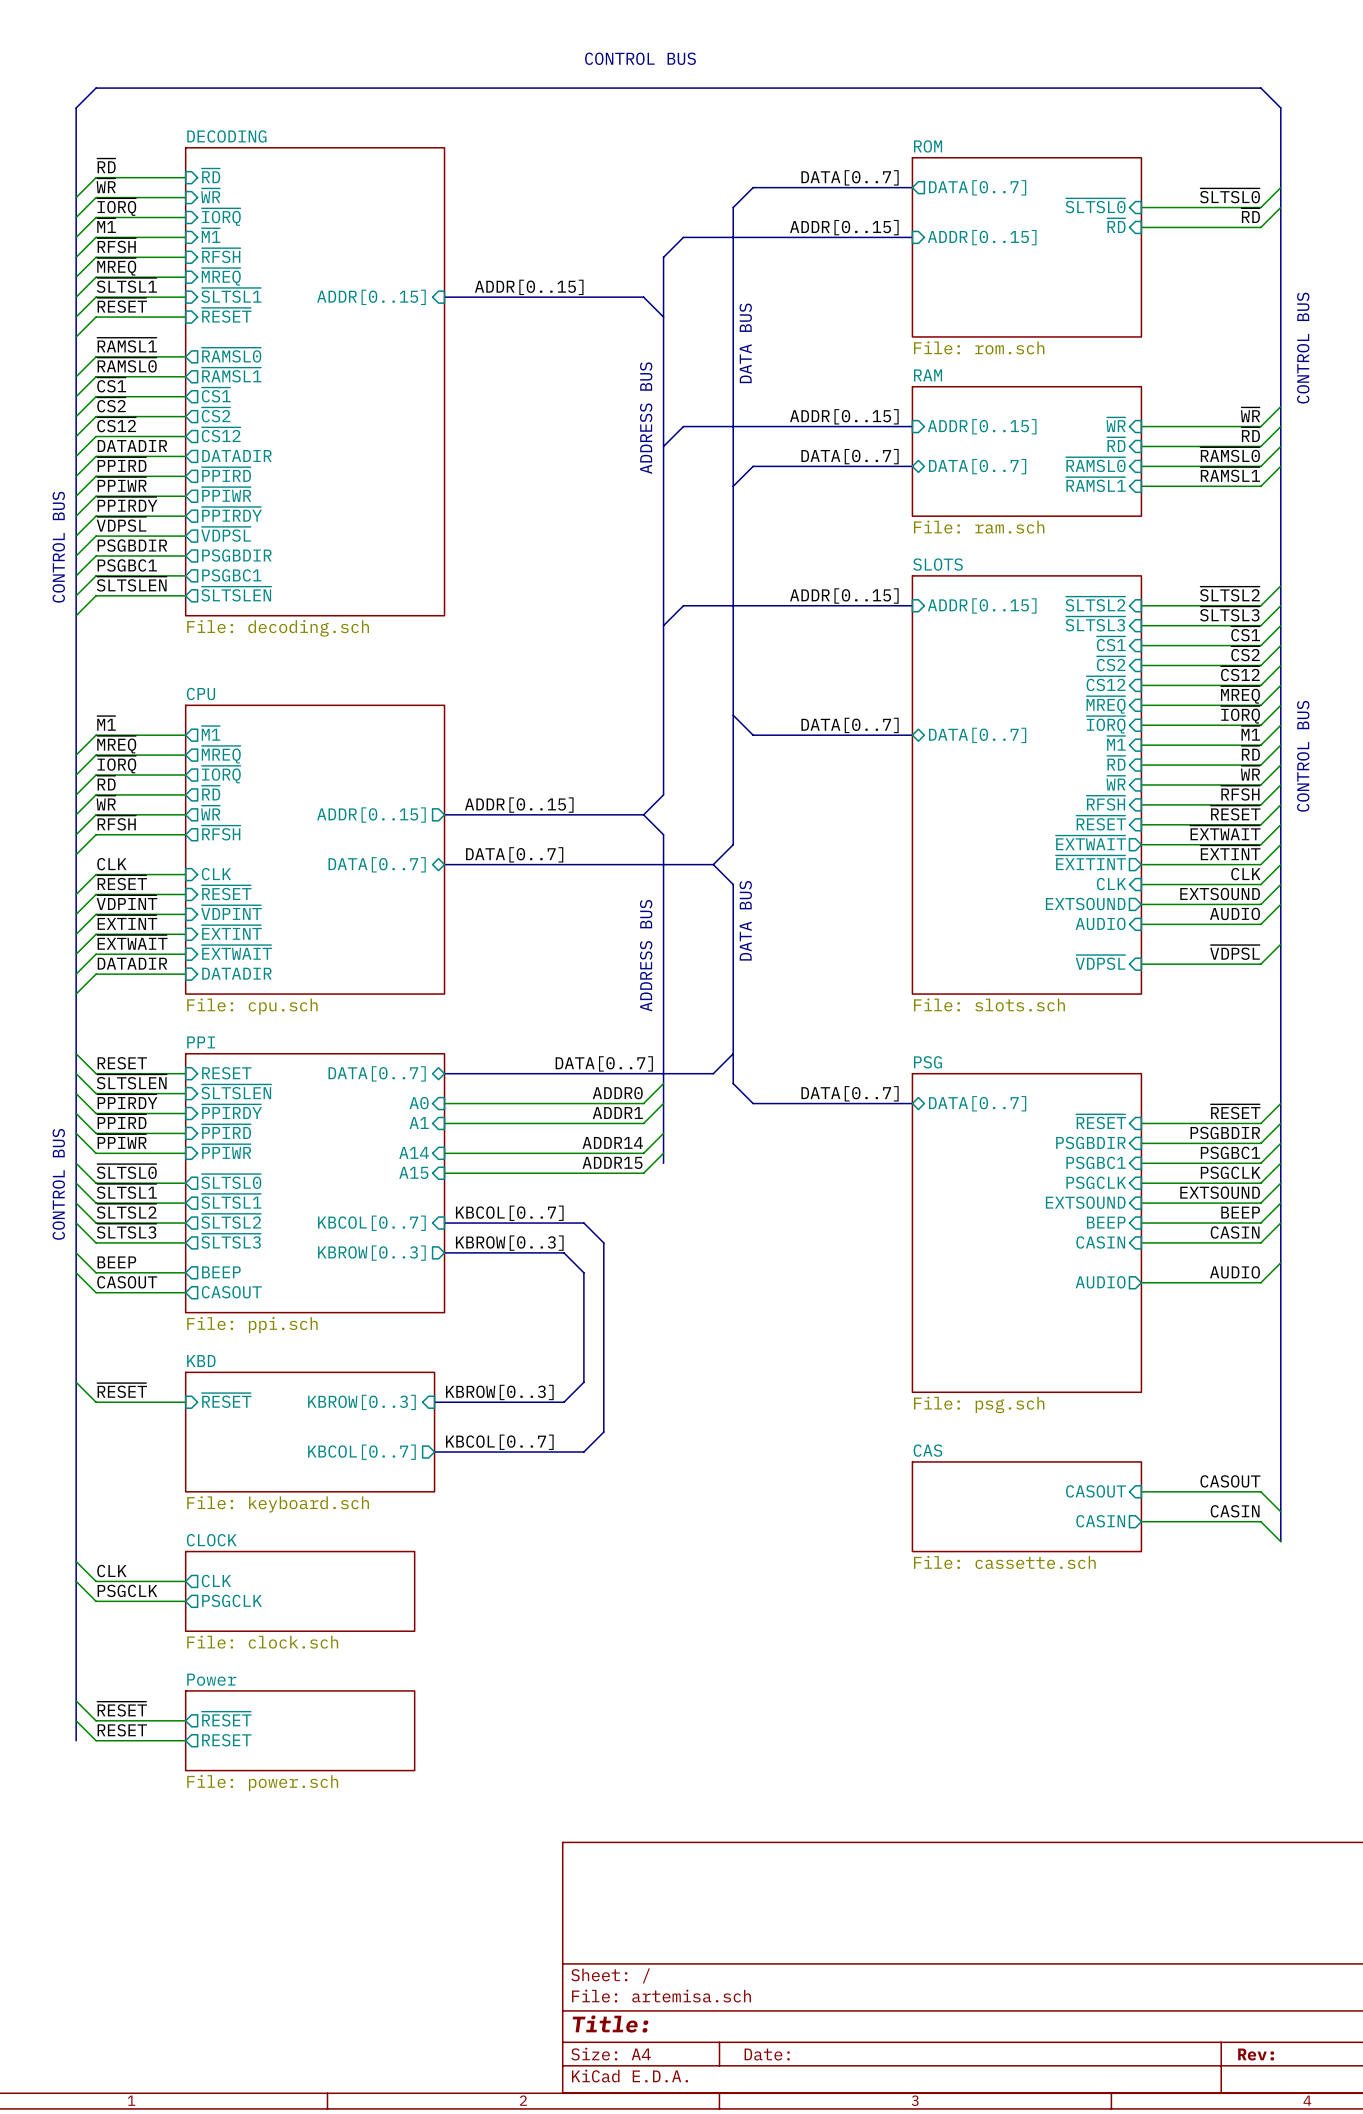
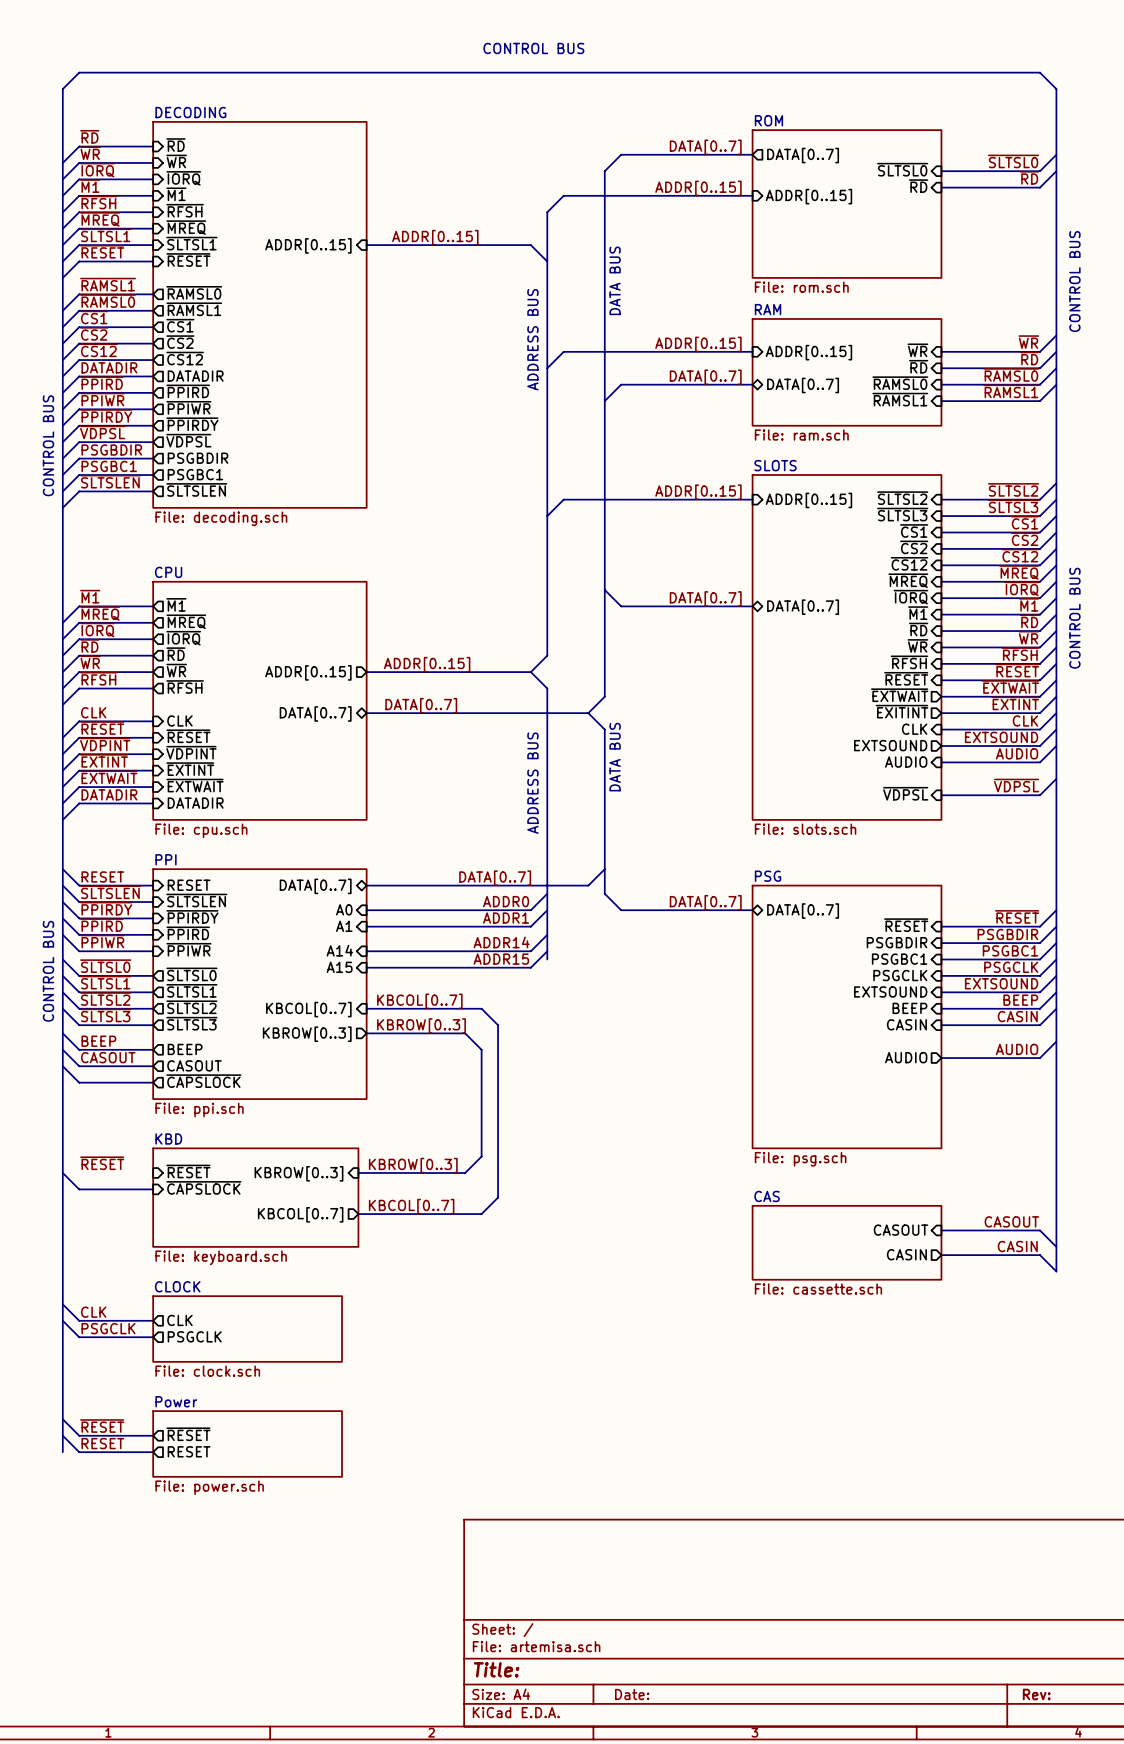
sheet PPI: File: ppi.sch (315, 1183) -> none
sheet PPI: none -> File: ppi.sch (259, 984)
wire: none -> (62, 1066) (79, 1082) (153, 1082)
sheet pin: none -> ~{CAPSLOCK} (203, 1081)
wire: (76, 1382) (96, 1402) (185, 1402) -> (62, 1172) (79, 1189) (153, 1189)
bus: (583, 1382) (563, 1402) (434, 1402) -> (481, 1140) (481, 1156) (465, 1172) (358, 1172)
label position: ~{RESET} (122, 1390) -> ~{RESET} (102, 1163)
label position: KBROW[0..3] (499, 1392) -> KBROW[0..3] (413, 1165)
sheet pin position: ~{RESET} (226, 1400) -> ~{RESET} (188, 1171)
sheet pin position: KBROW[0..3] (361, 1402) -> KBROW[0..3] (299, 1173)
sheet KBD position: (310, 1432) -> (255, 1197)
bus: (603, 1432) (583, 1452) (434, 1452) -> (498, 1181) (498, 1197) (481, 1214) (358, 1214)
sheet pin: none -> ~{CAPSLOCK} (203, 1187)
label position: KBCOL[0..7] (499, 1442) -> KBCOL[0..7] (411, 1206)
sheet pin position: KBCOL[0..7] (361, 1452) -> KBCOL[0..7] (300, 1214)
wire: (76, 1561) (96, 1581) (185, 1581) -> (62, 1320) (79, 1337) (153, 1337)
label: CLK (111, 1571) -> none
sheet pin: CLK (216, 1580) -> none
label: PSGCLK (127, 1590) -> CLK (93, 1312)
sheet CLOCK position: (300, 1591) -> (247, 1329)
sheet pin: PSGCLK (232, 1600) -> CLK (179, 1320)
label: none -> PSGCLK (108, 1328)
sheet pin: none -> PSGCLK (194, 1336)
wire: (76, 1700) (96, 1720) (185, 1720) -> (62, 1435) (79, 1452) (153, 1452)
label: ~{RESET} (122, 1709) -> none
sheet pin: ~{RESET} (226, 1719) -> none
label: RESET (122, 1730) -> ~{RESET} (102, 1426)
sheet Power position: (300, 1730) -> (247, 1443)
bus: none -> (62, 1435) (62, 1452)
sheet pin: RESET (226, 1740) -> ~{RESET} (188, 1434)
label: none -> RESET (102, 1443)
sheet pin: none -> RESET (189, 1451)

